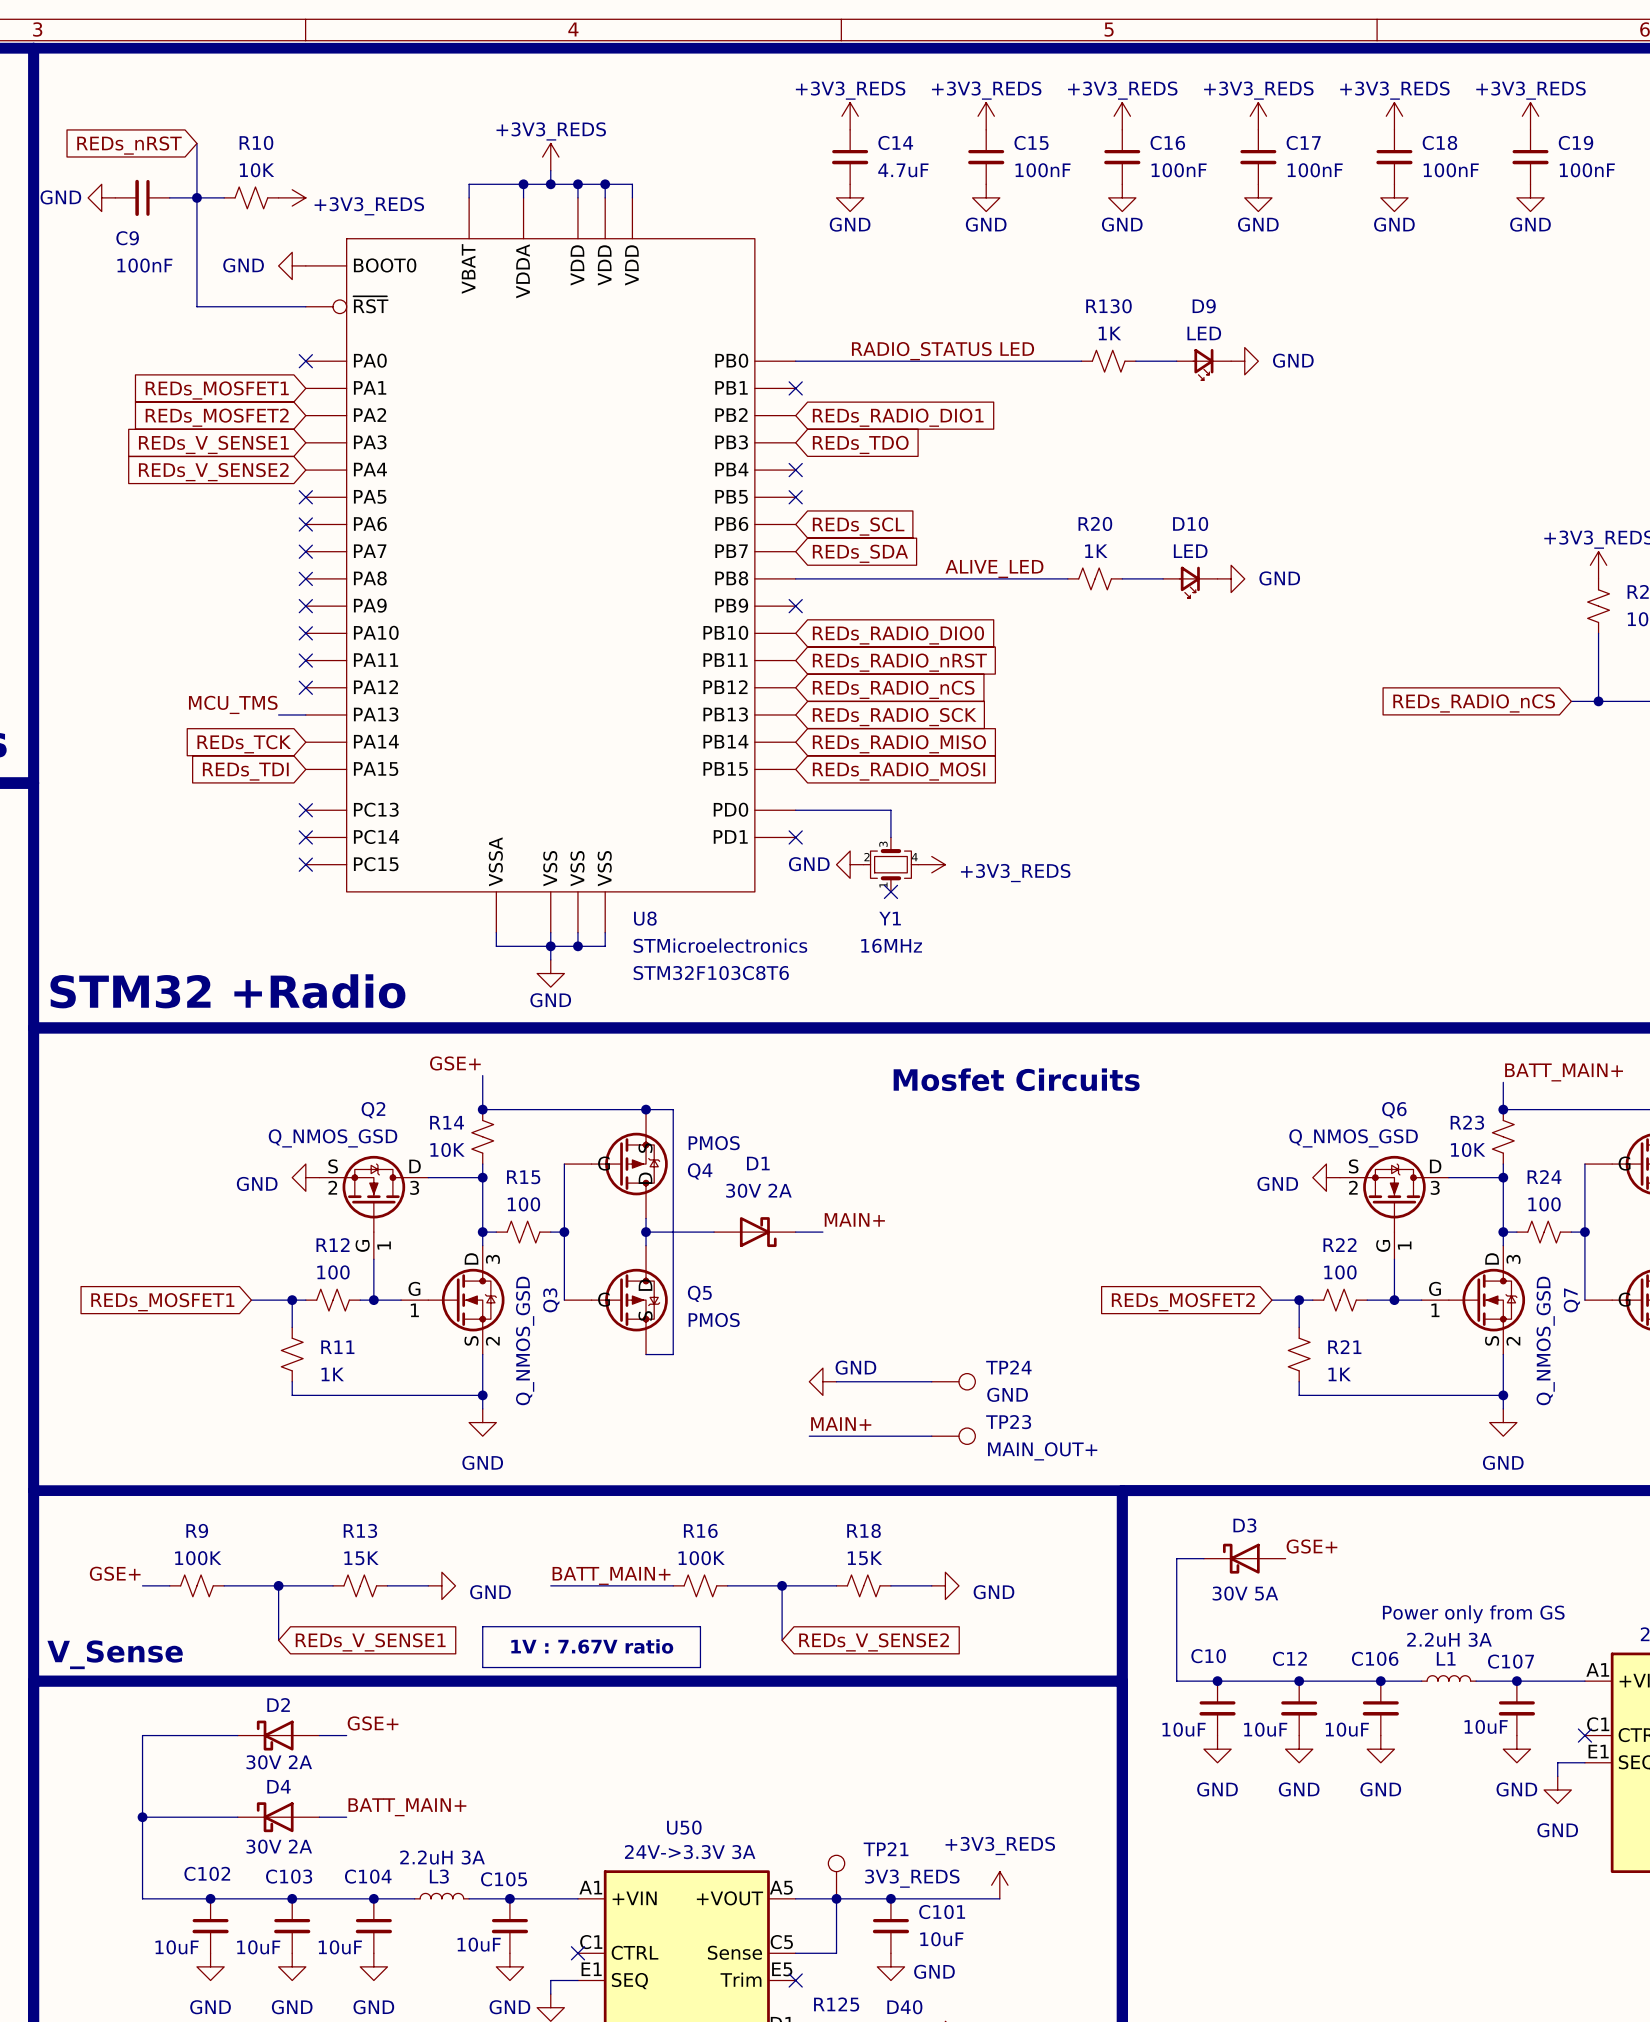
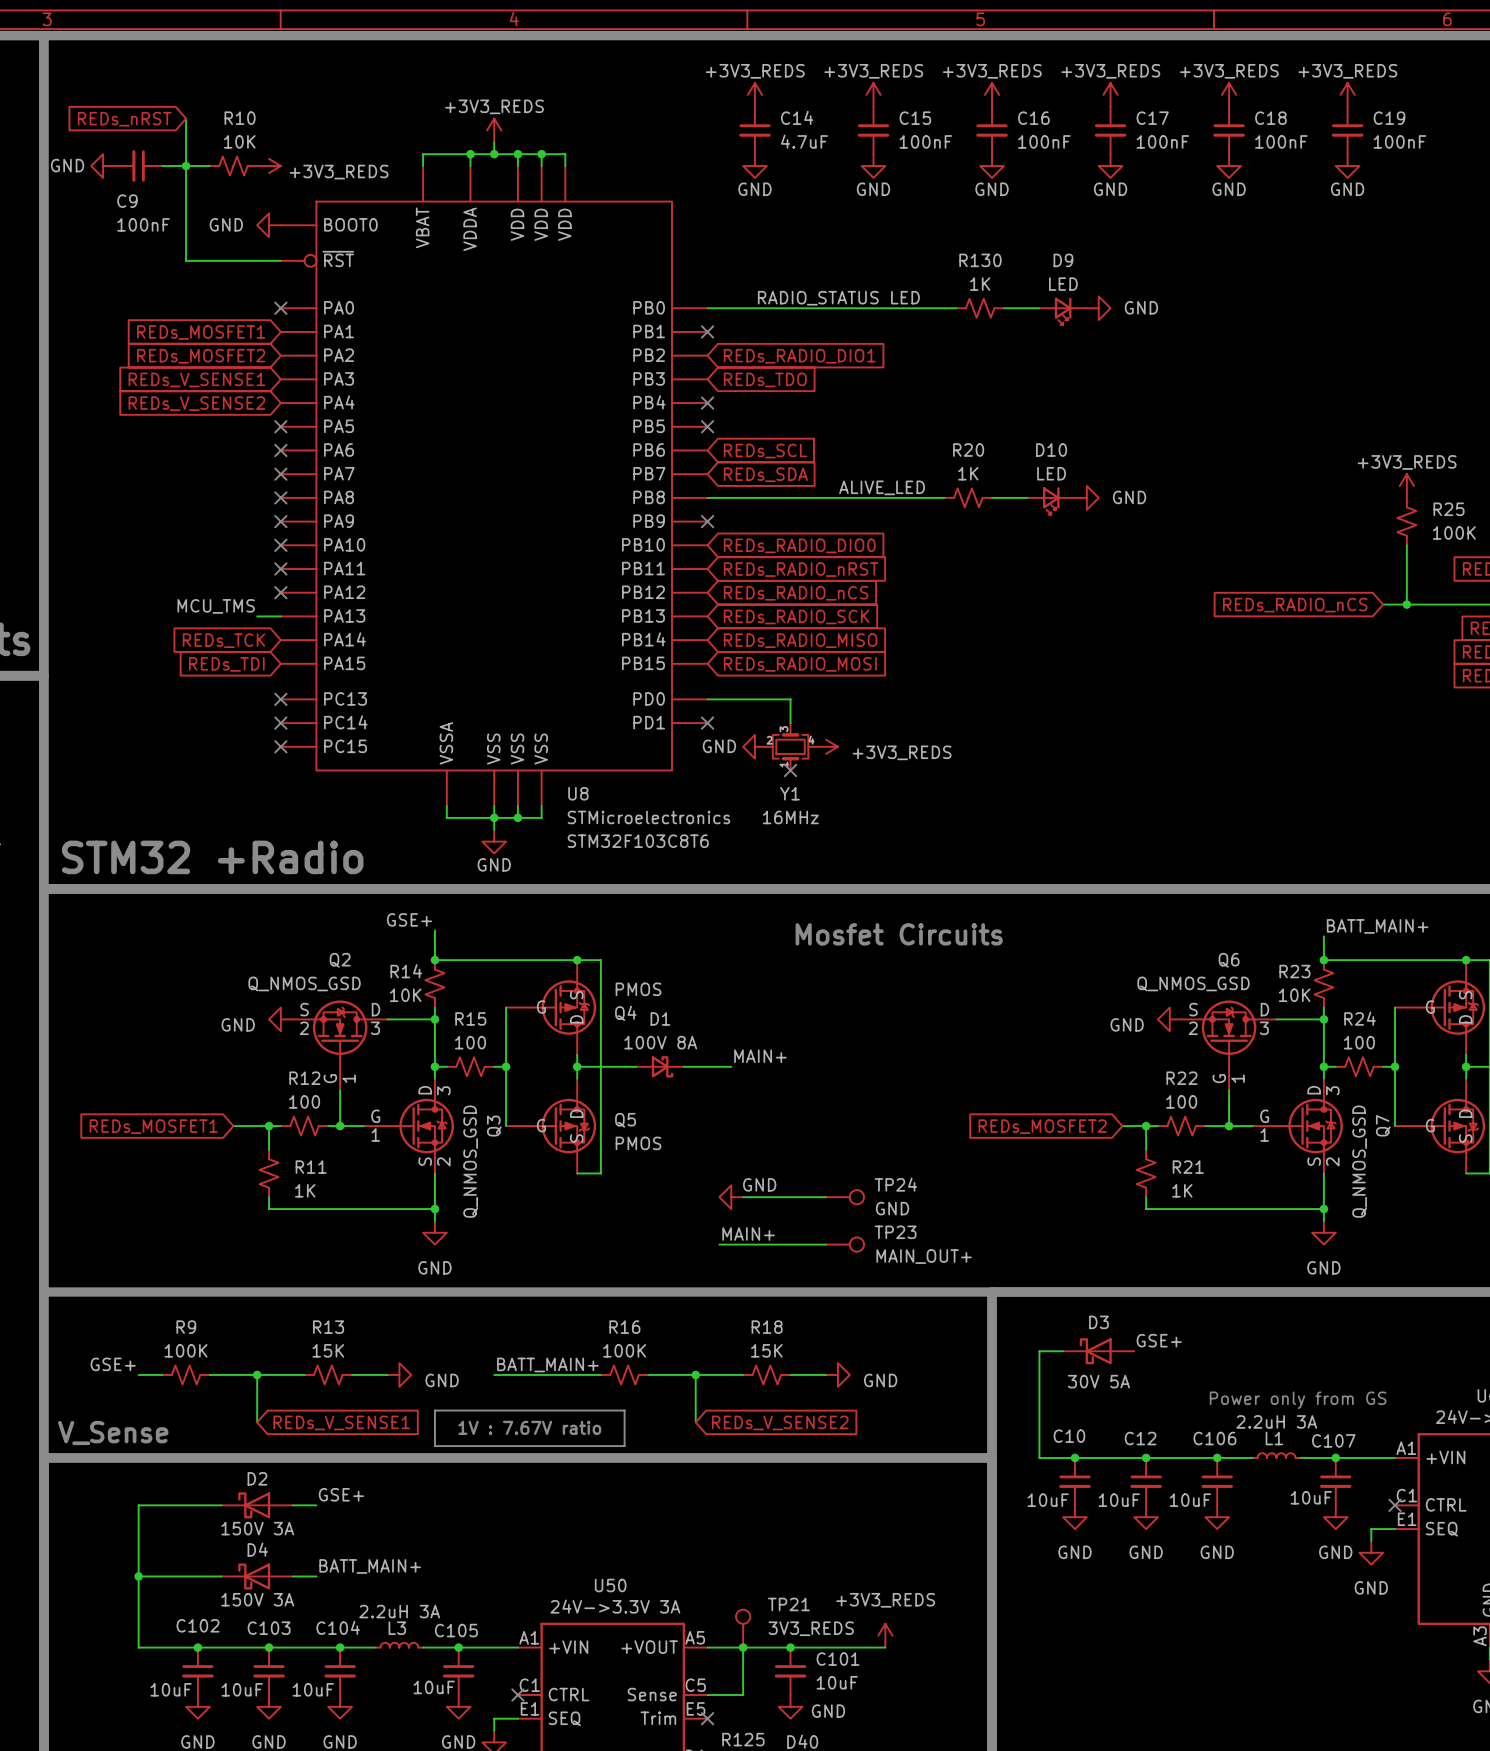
D1 value: 30V 2A (758, 1190) -> 100V 8A (660, 1042)
D1 symbol: [714, 1217, 796, 1248] -> [636, 1056, 684, 1078]
D2 value: 30V 2A (279, 1762) -> 150V 3A (257, 1528)
D4 value: 30V 2A (279, 1846) -> 150V 3A (257, 1599)

